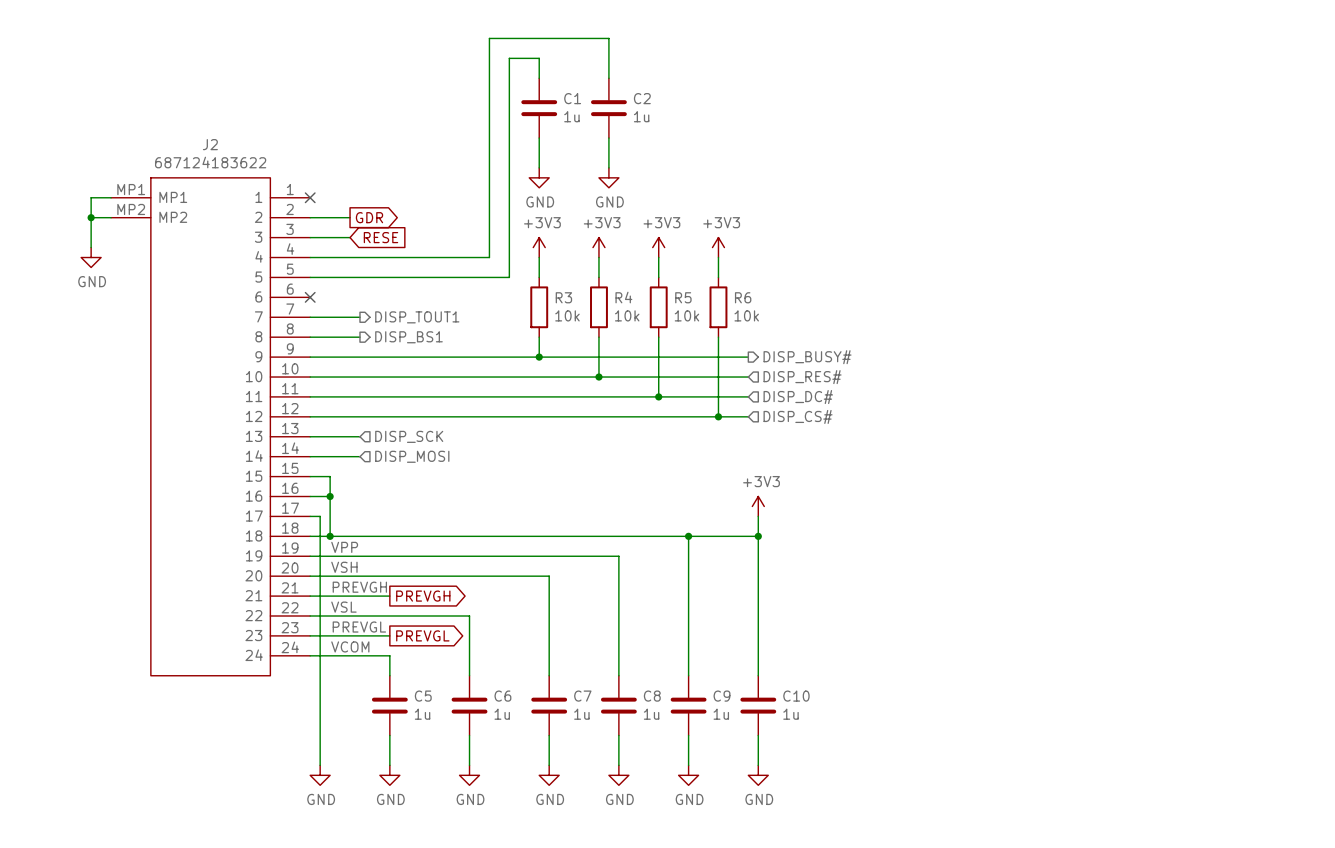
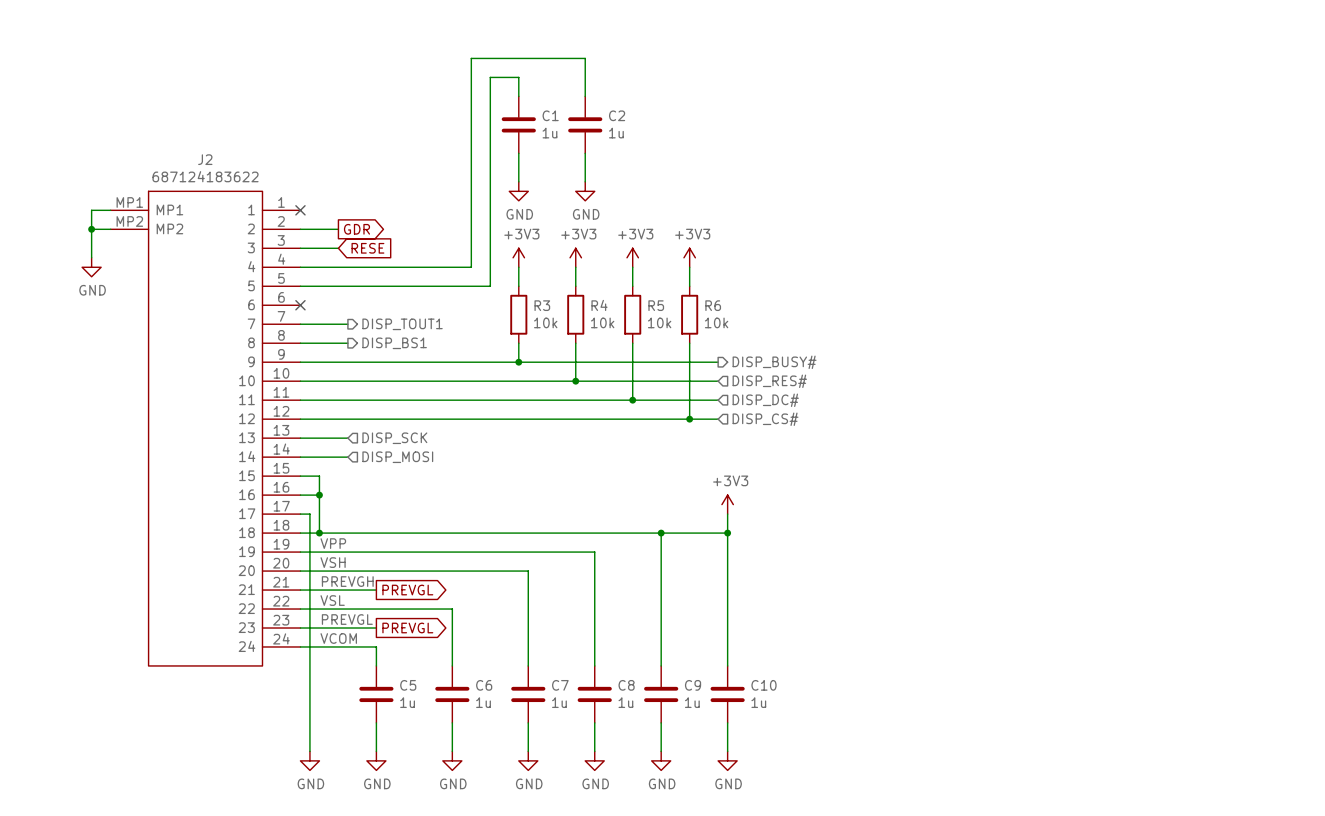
global label: PREVGH (423, 596) -> PREVGL (407, 590)

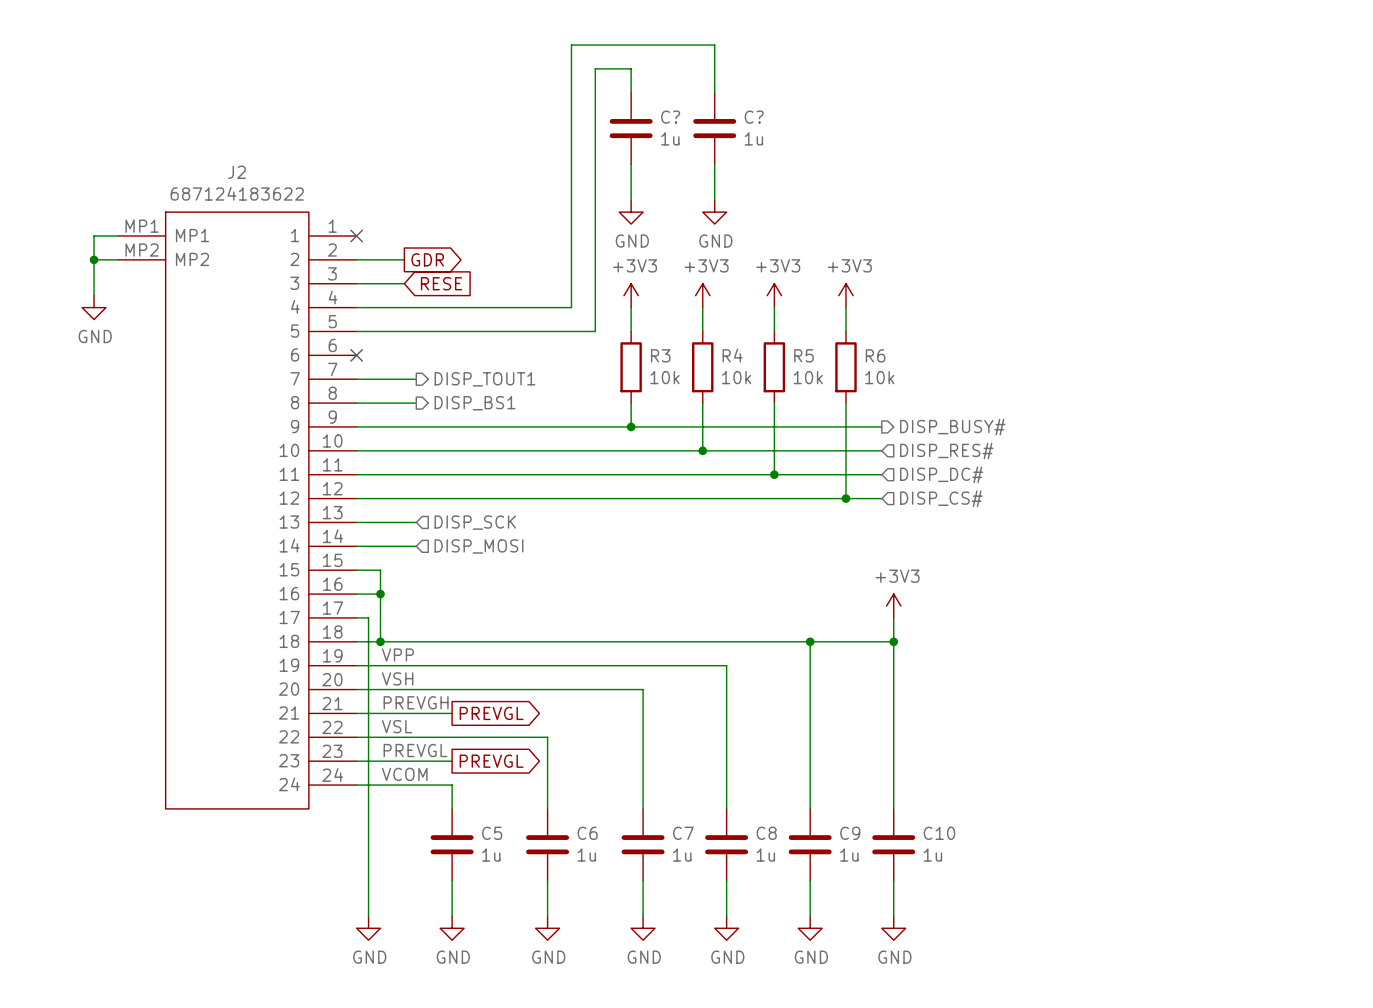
C1 name: C1 (550, 115) -> C? (670, 117)
C2 name: C2 (617, 115) -> C? (754, 117)

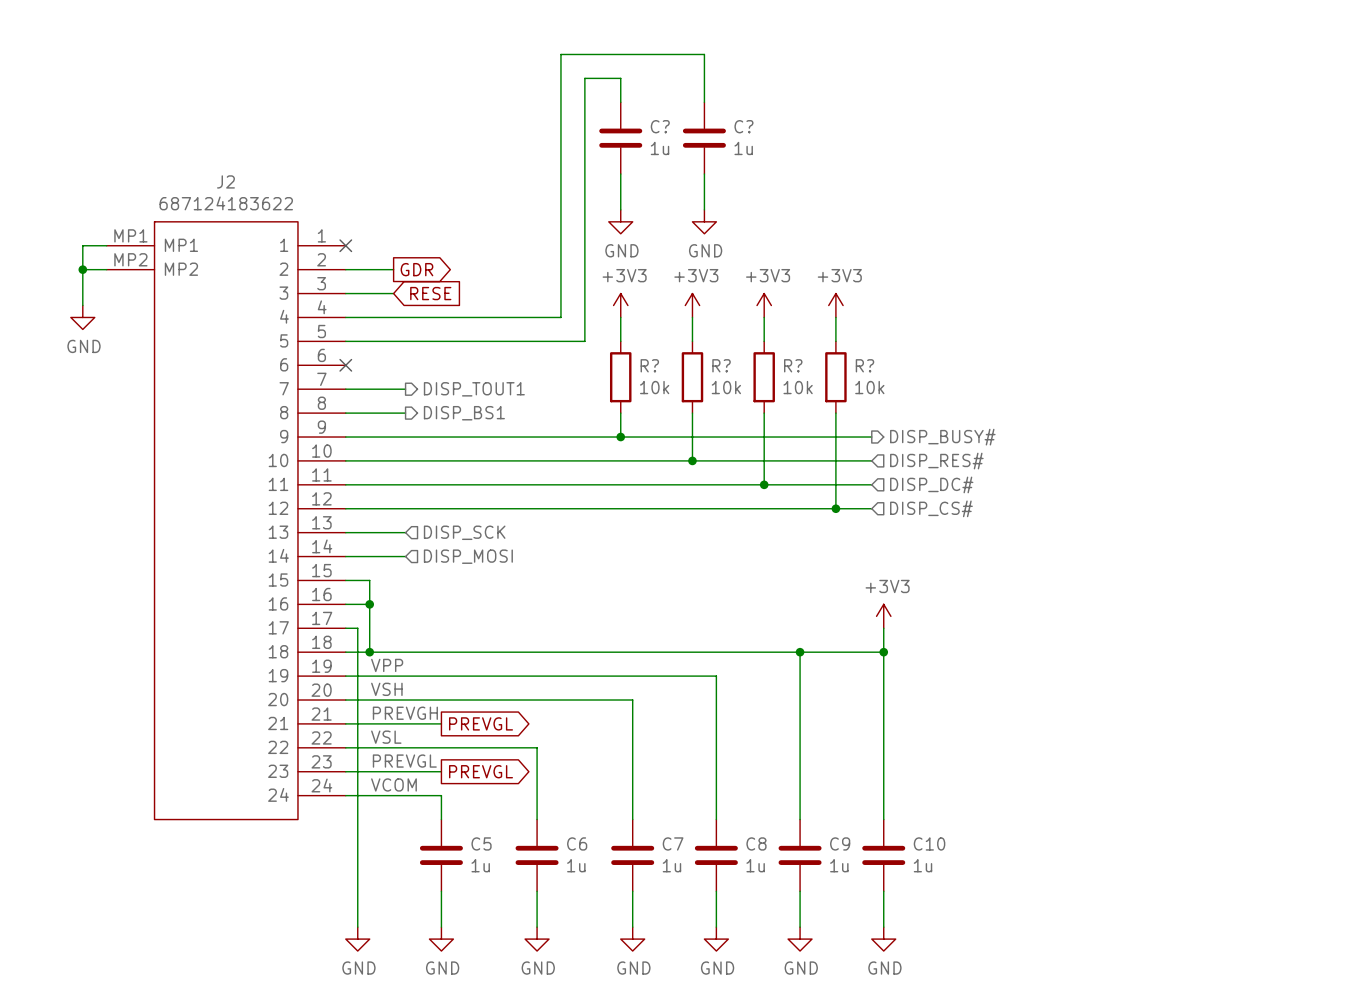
R3 name: R3 (660, 355) -> R? (649, 365)
R4 name: R4 (732, 355) -> R? (721, 365)
R5 name: R5 (803, 355) -> R? (793, 365)
R6 name: R6 (875, 355) -> R? (864, 365)

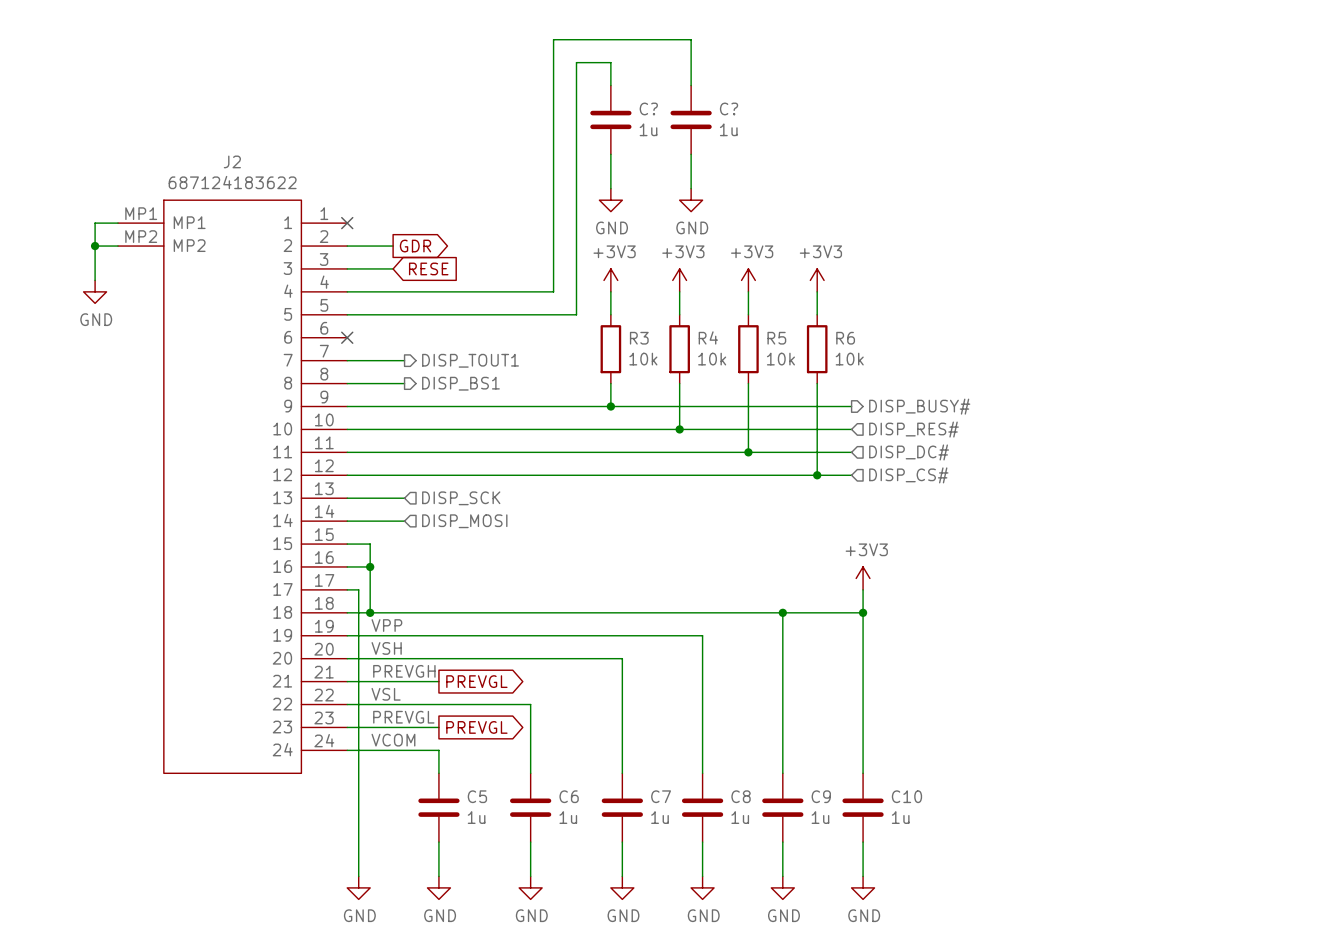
R? name: R? (649, 365) -> R3 (639, 338)
R? name: R? (721, 365) -> R4 (708, 337)
R? name: R? (793, 365) -> R5 (776, 338)
R? name: R? (864, 365) -> R6 (845, 338)

